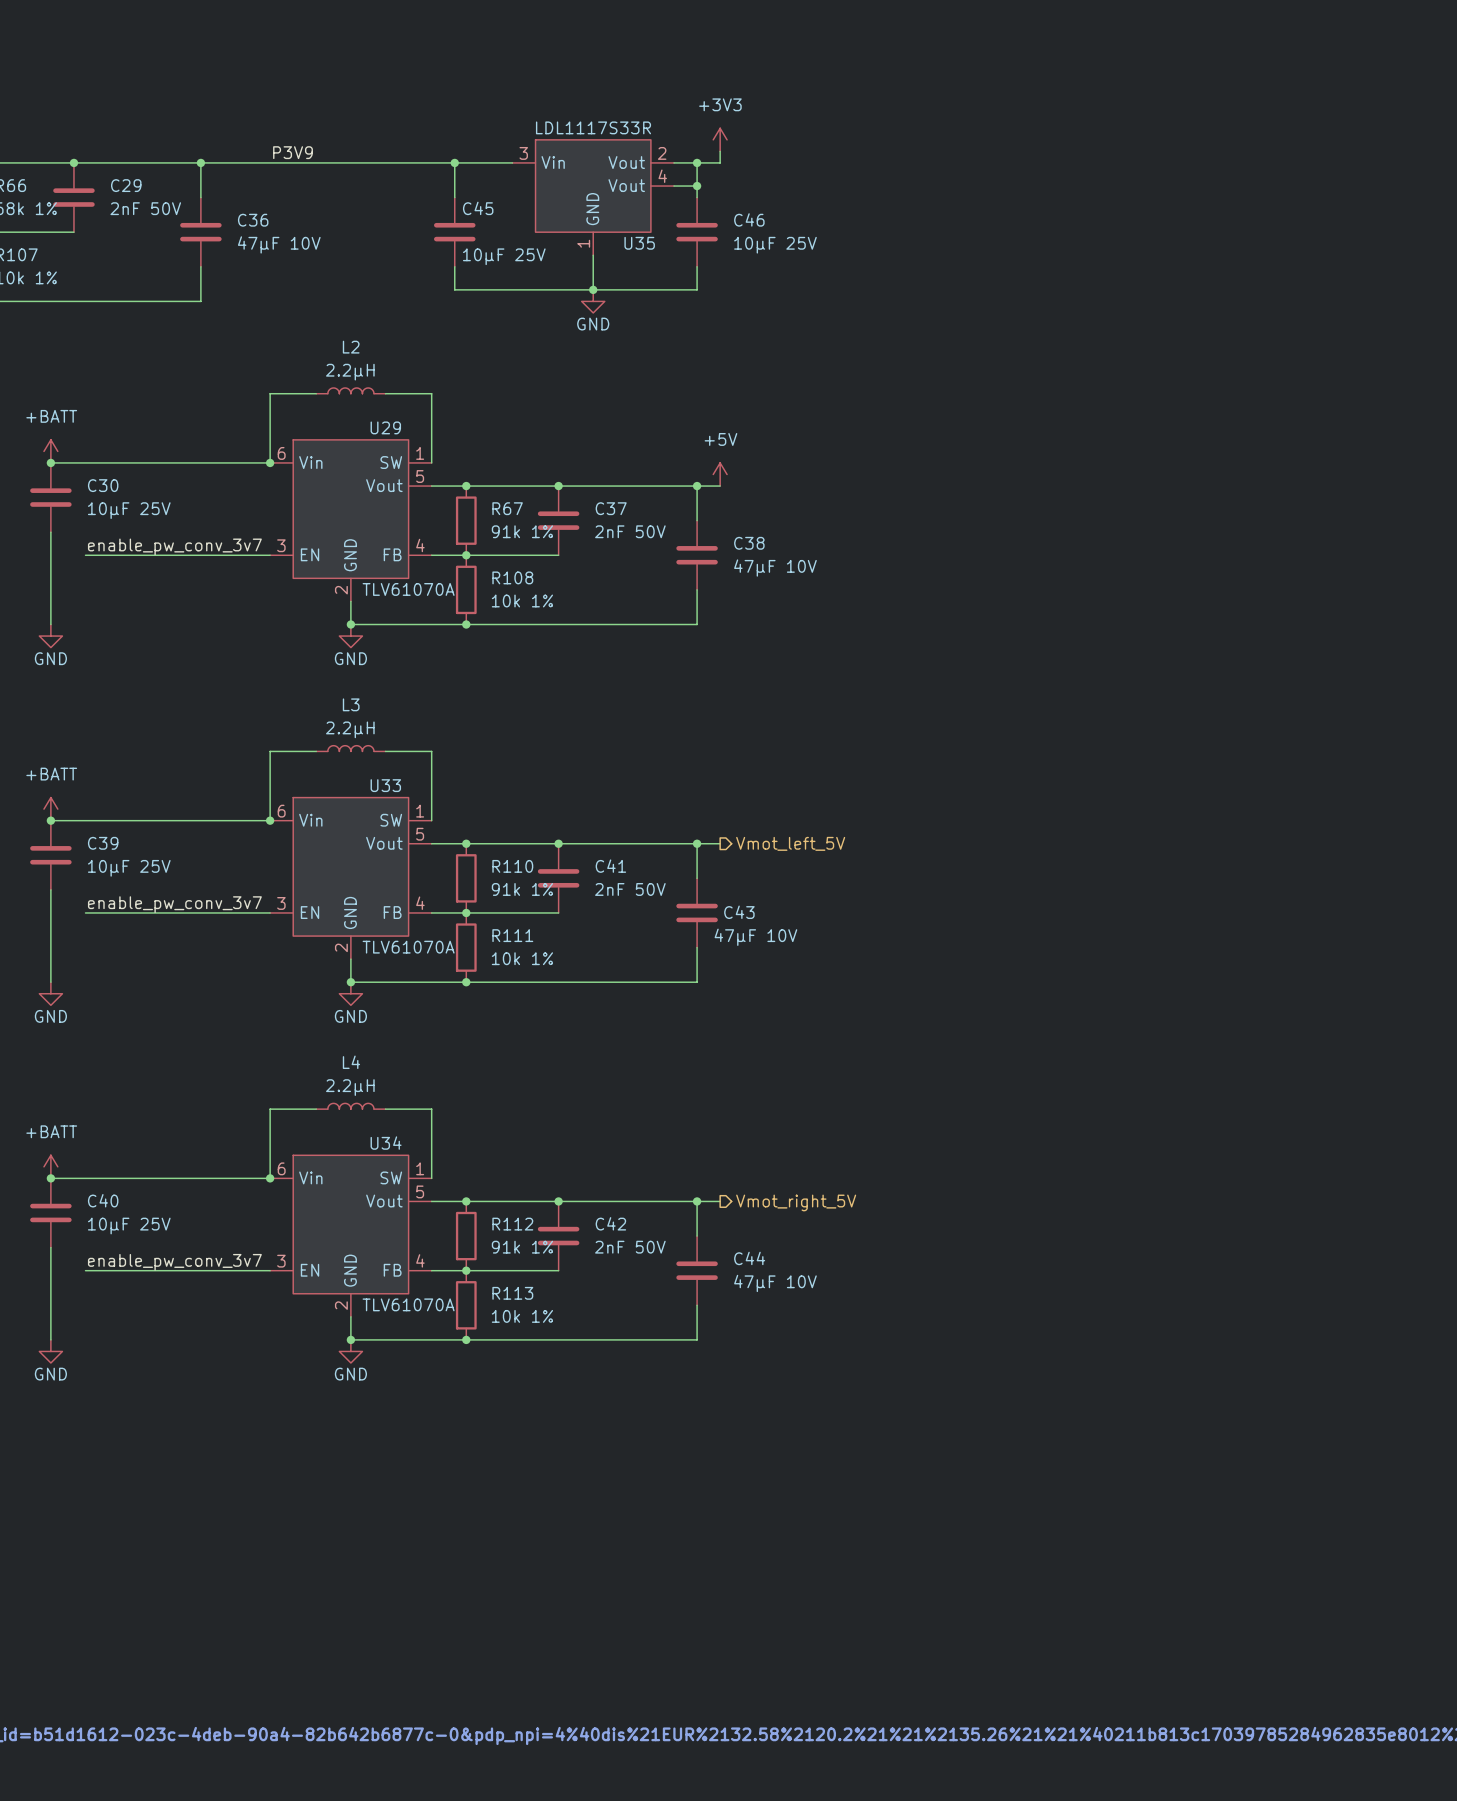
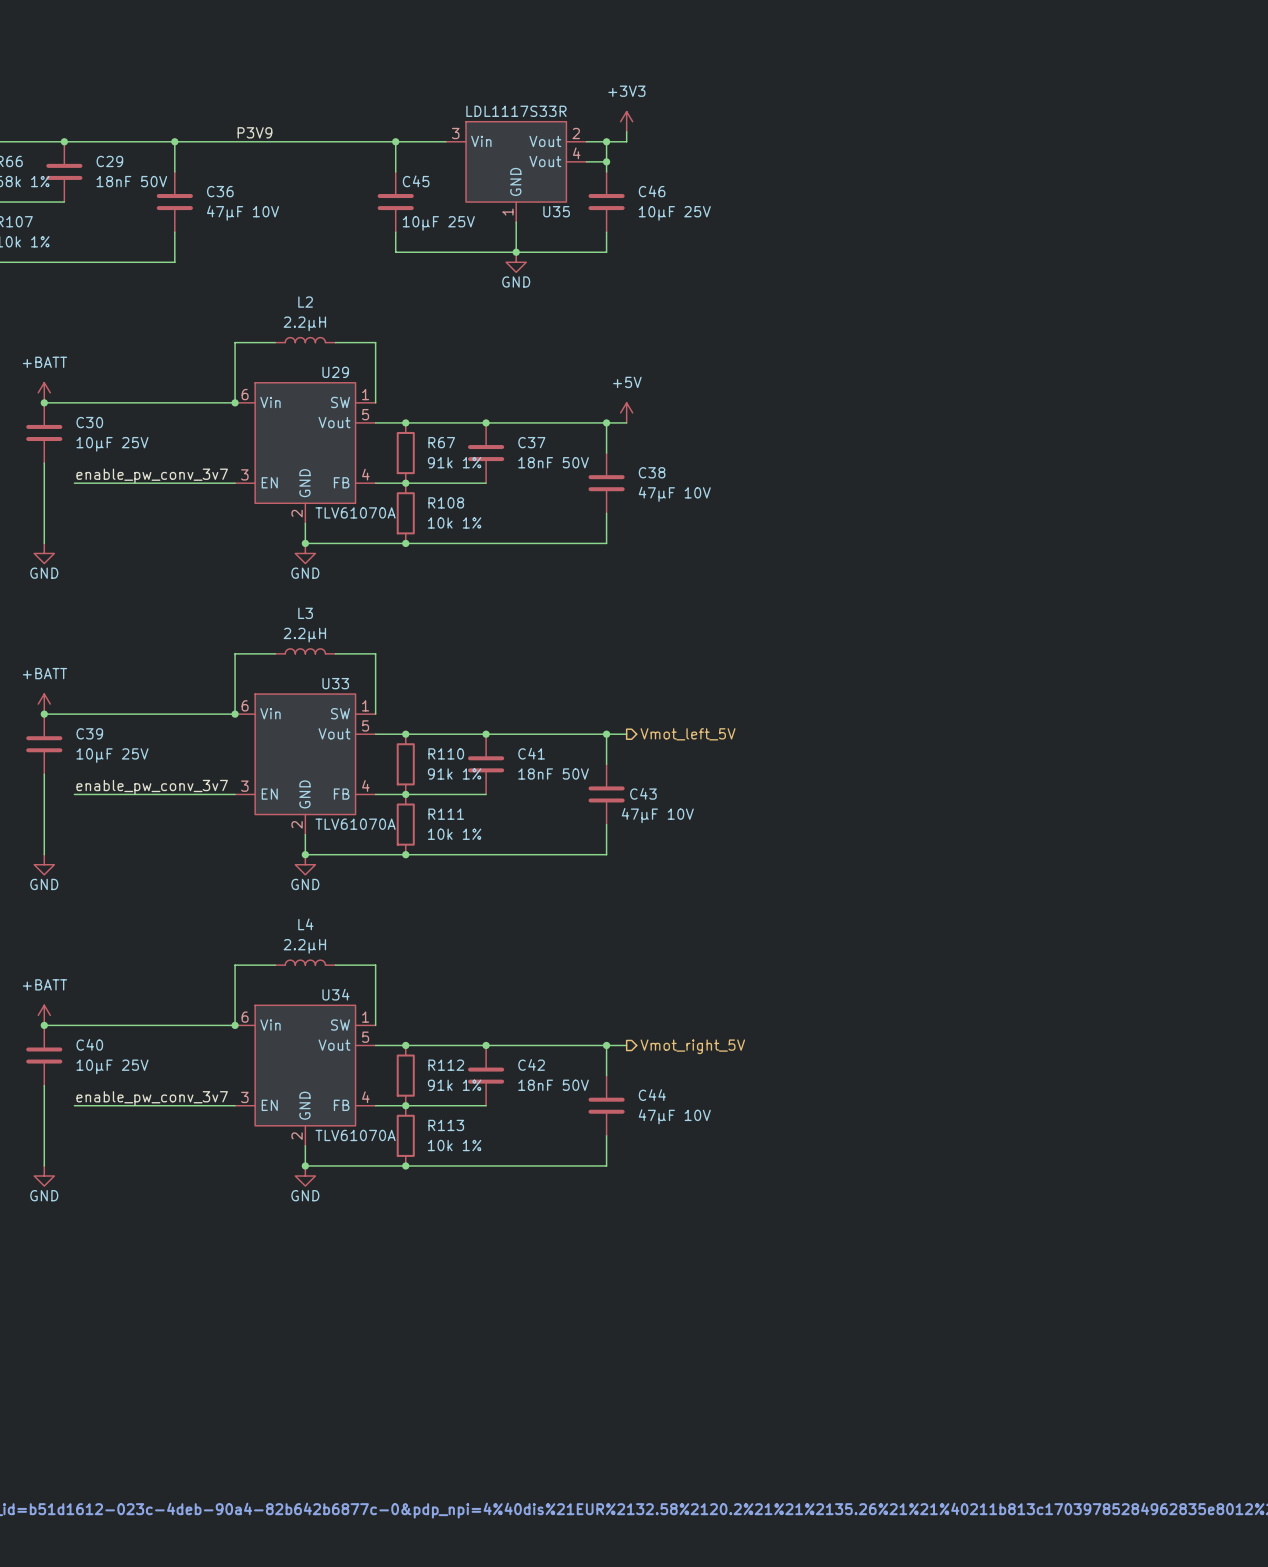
C29 value: 2nF 50V (145, 208) -> 18nF 50V (131, 181)
C37 value: 2nF 50V (630, 531) -> 18nF 50V (553, 462)
C41 value: 2nF 50V (630, 889) -> 18nF 50V (553, 773)
C42 value: 2nF 50V (630, 1247) -> 18nF 50V (553, 1085)

